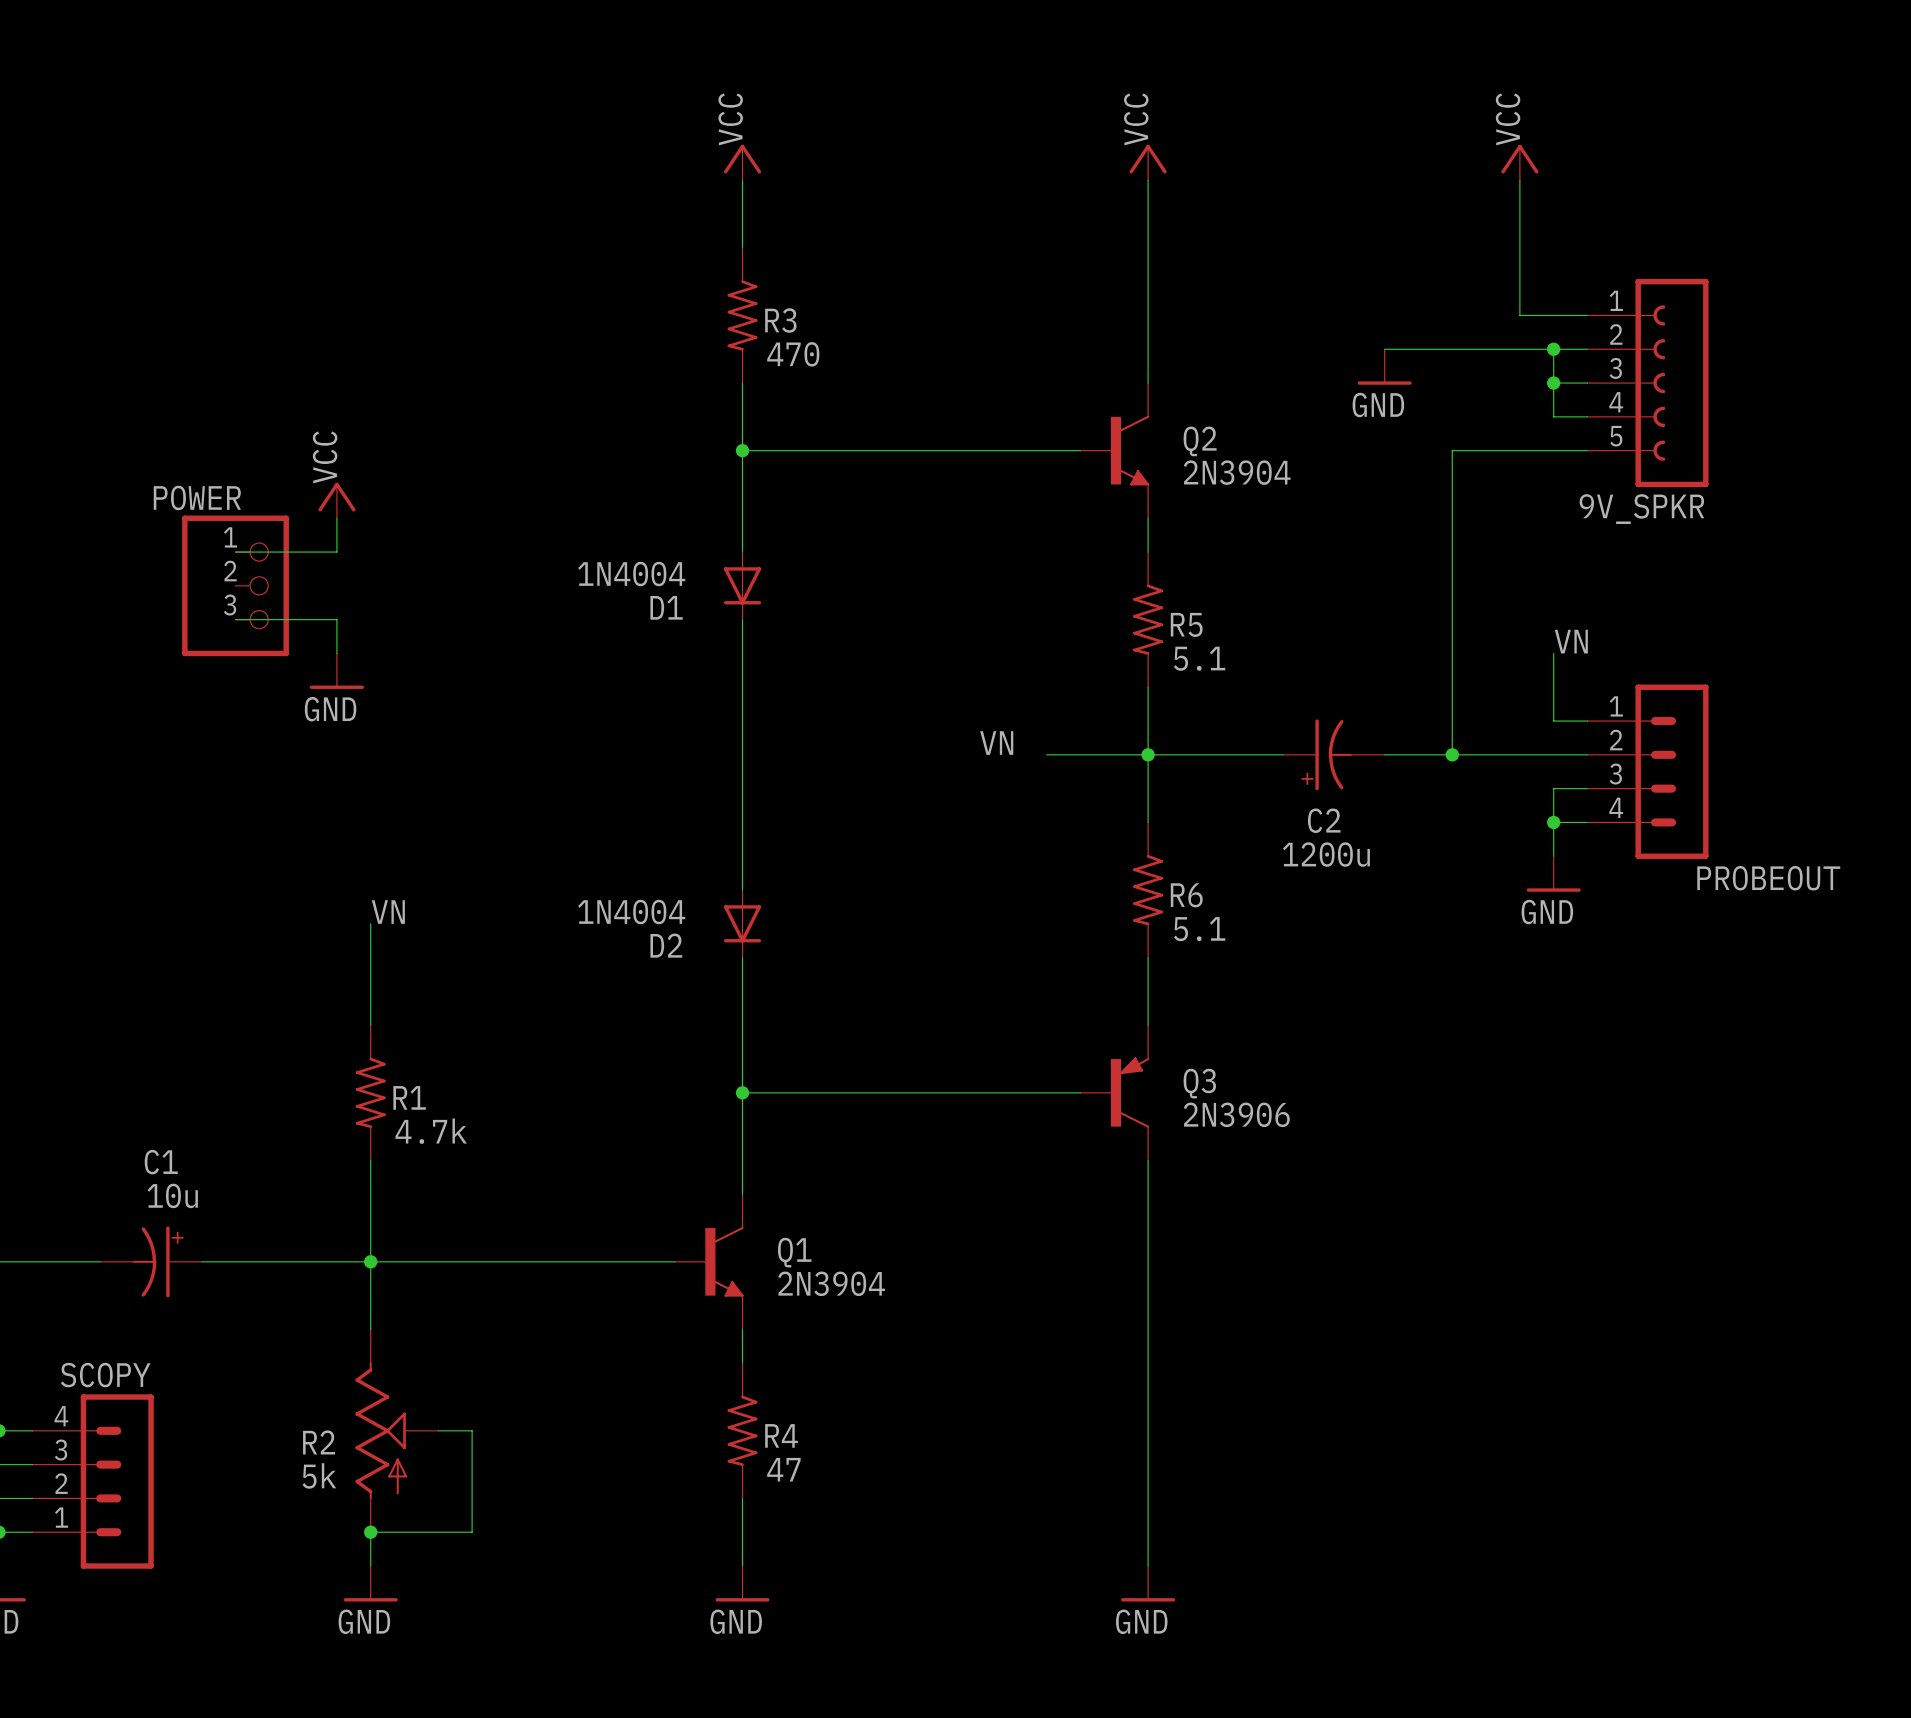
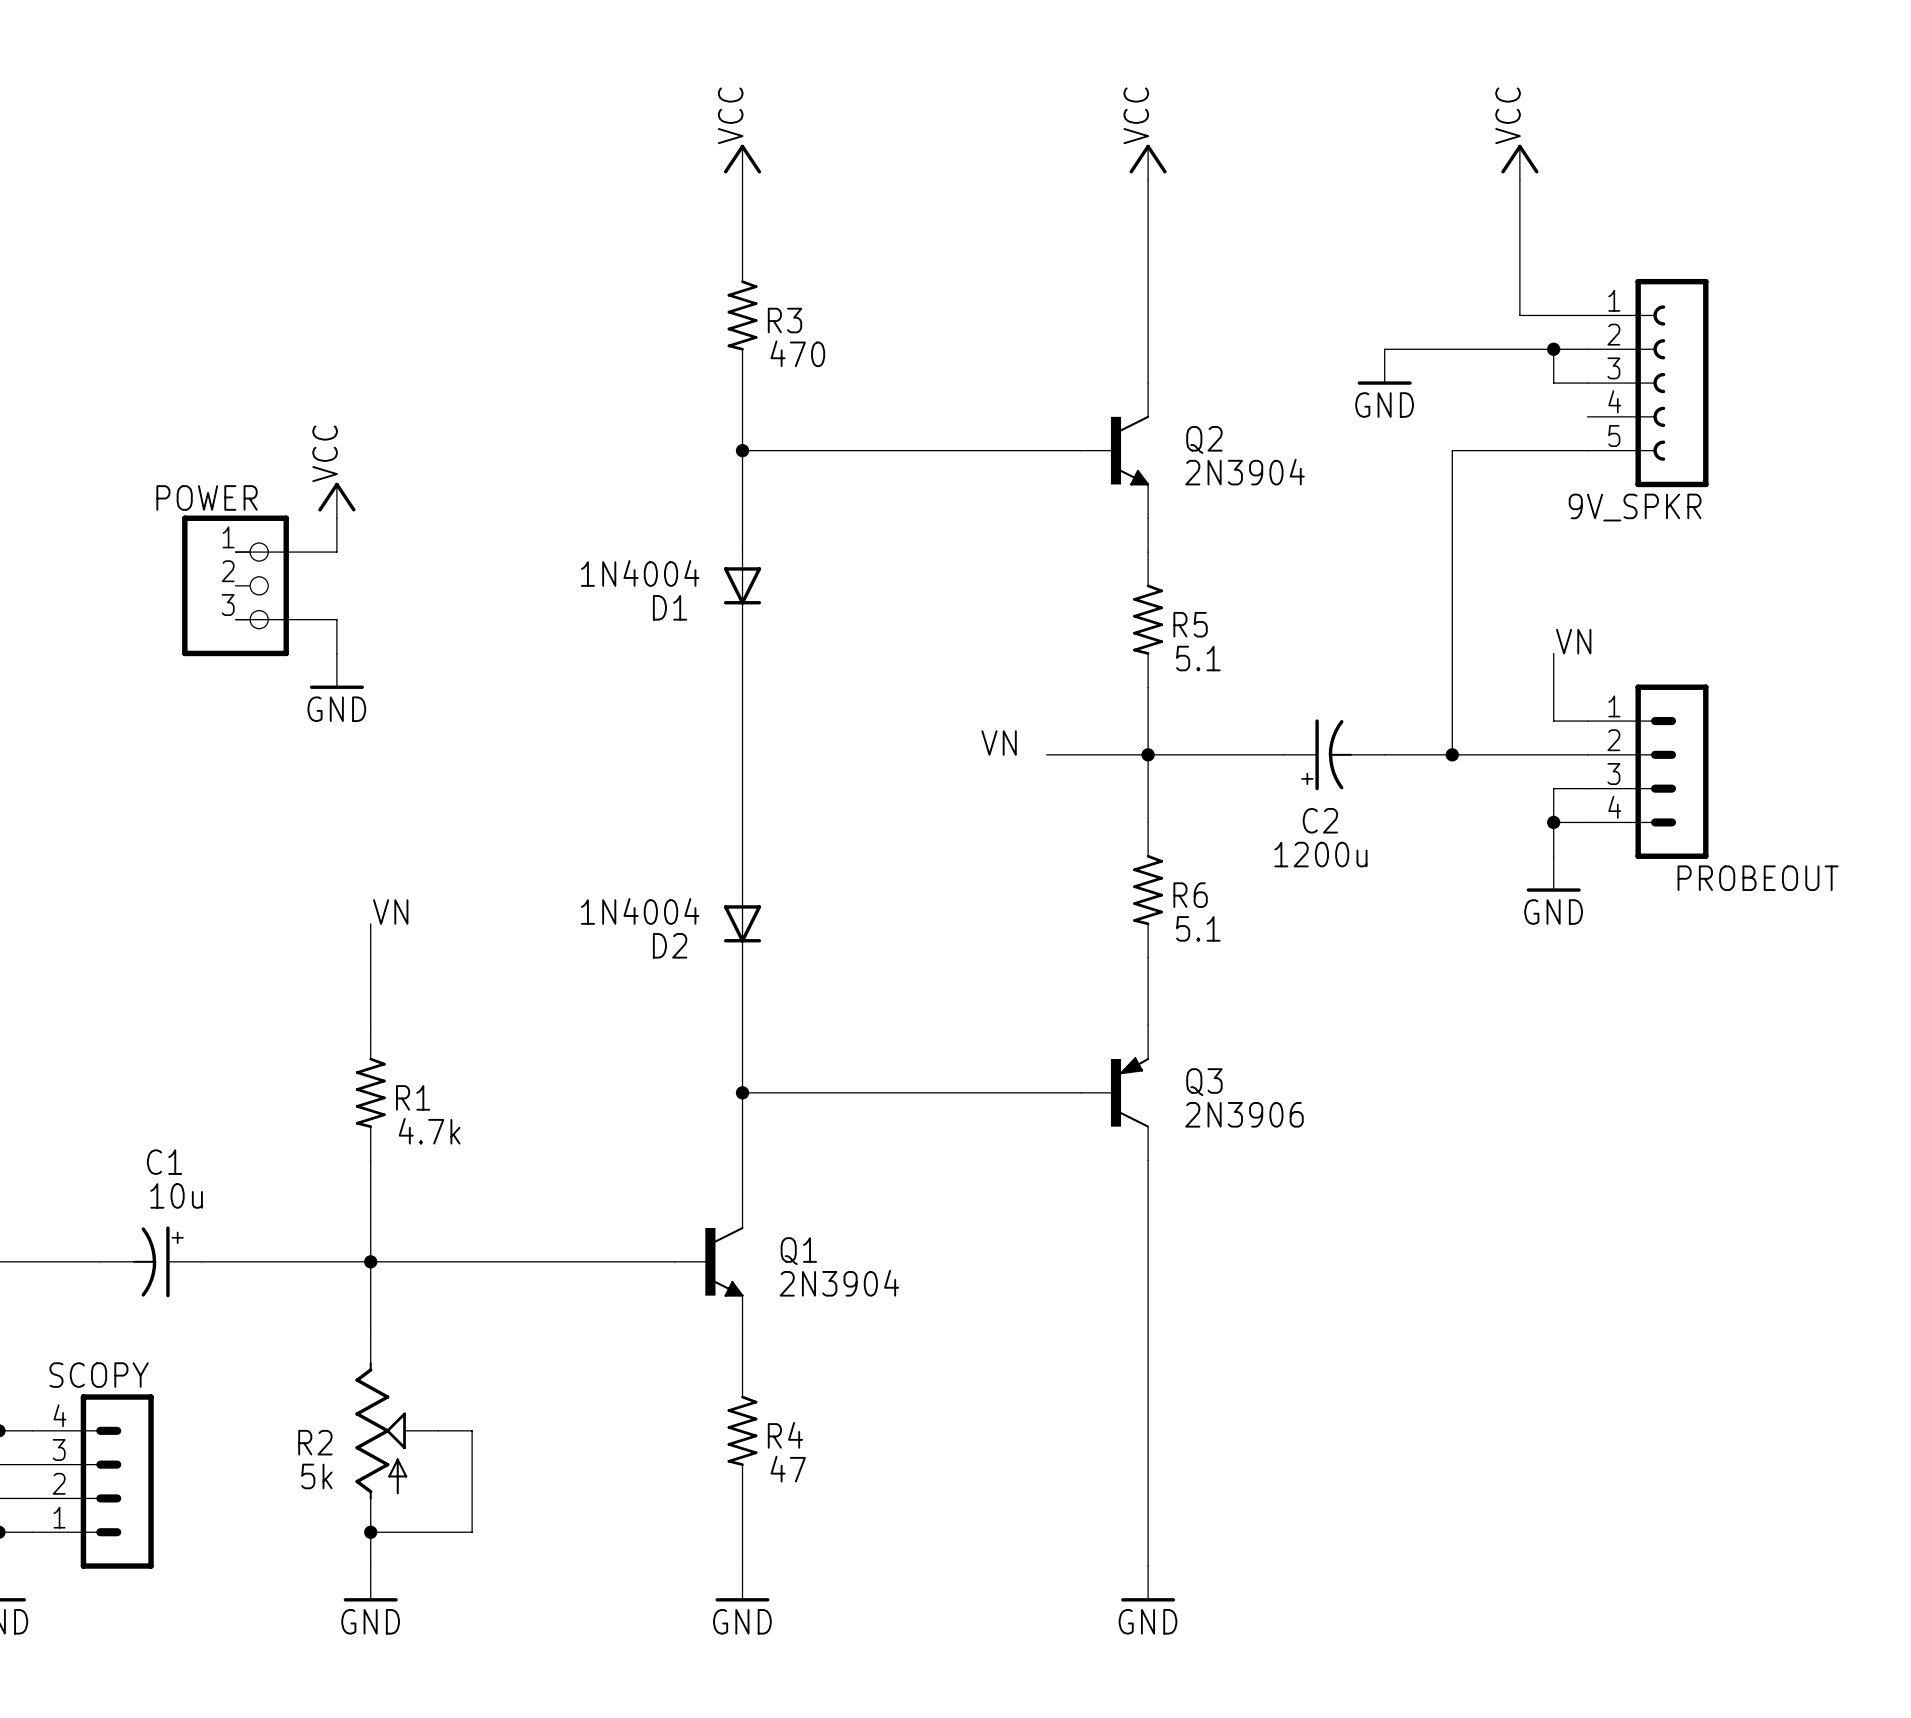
wire: (1553, 383) (1553, 416) (1587, 416) -> none
junction: (1553, 383) -> none

